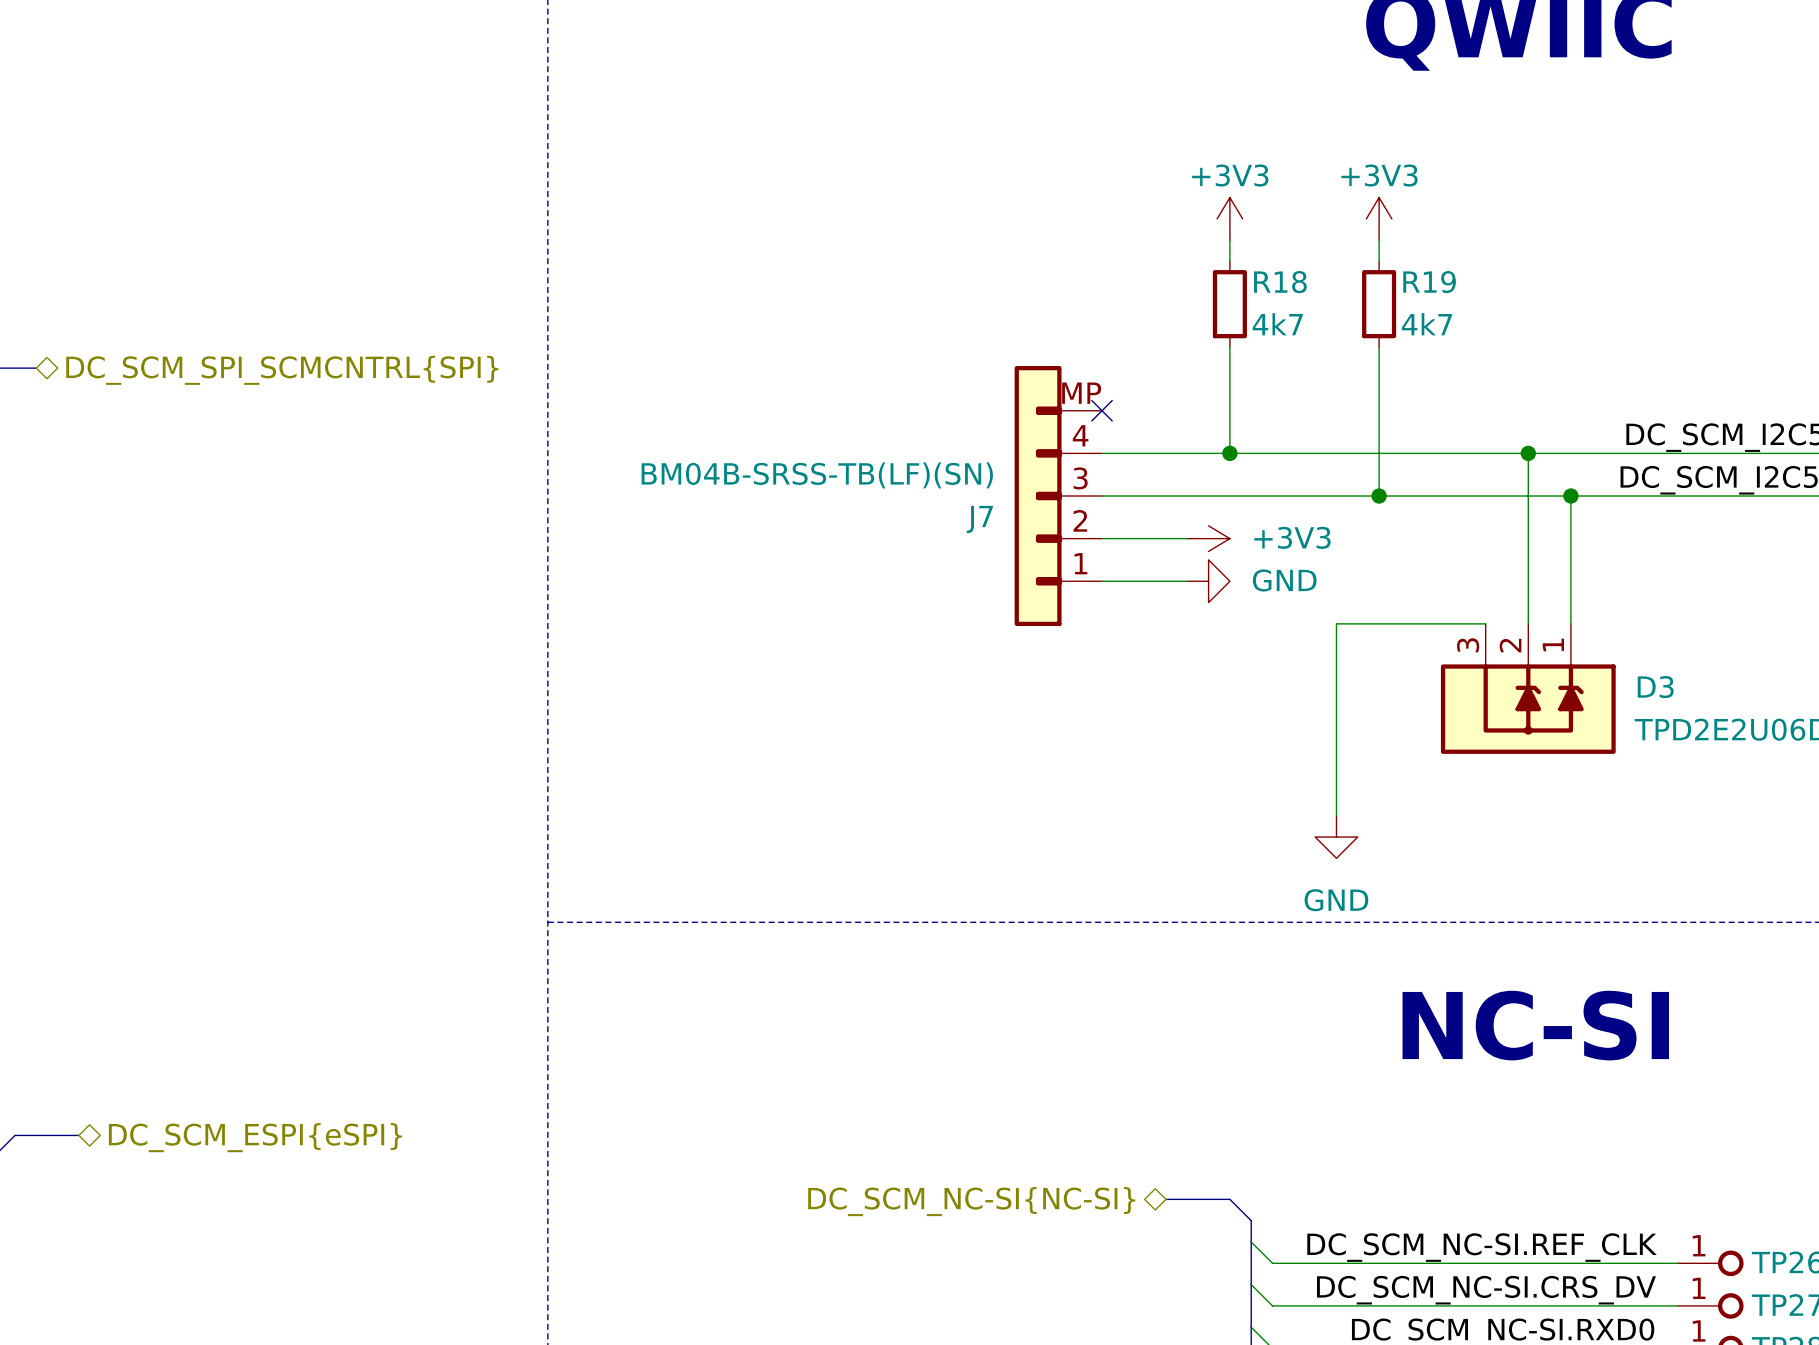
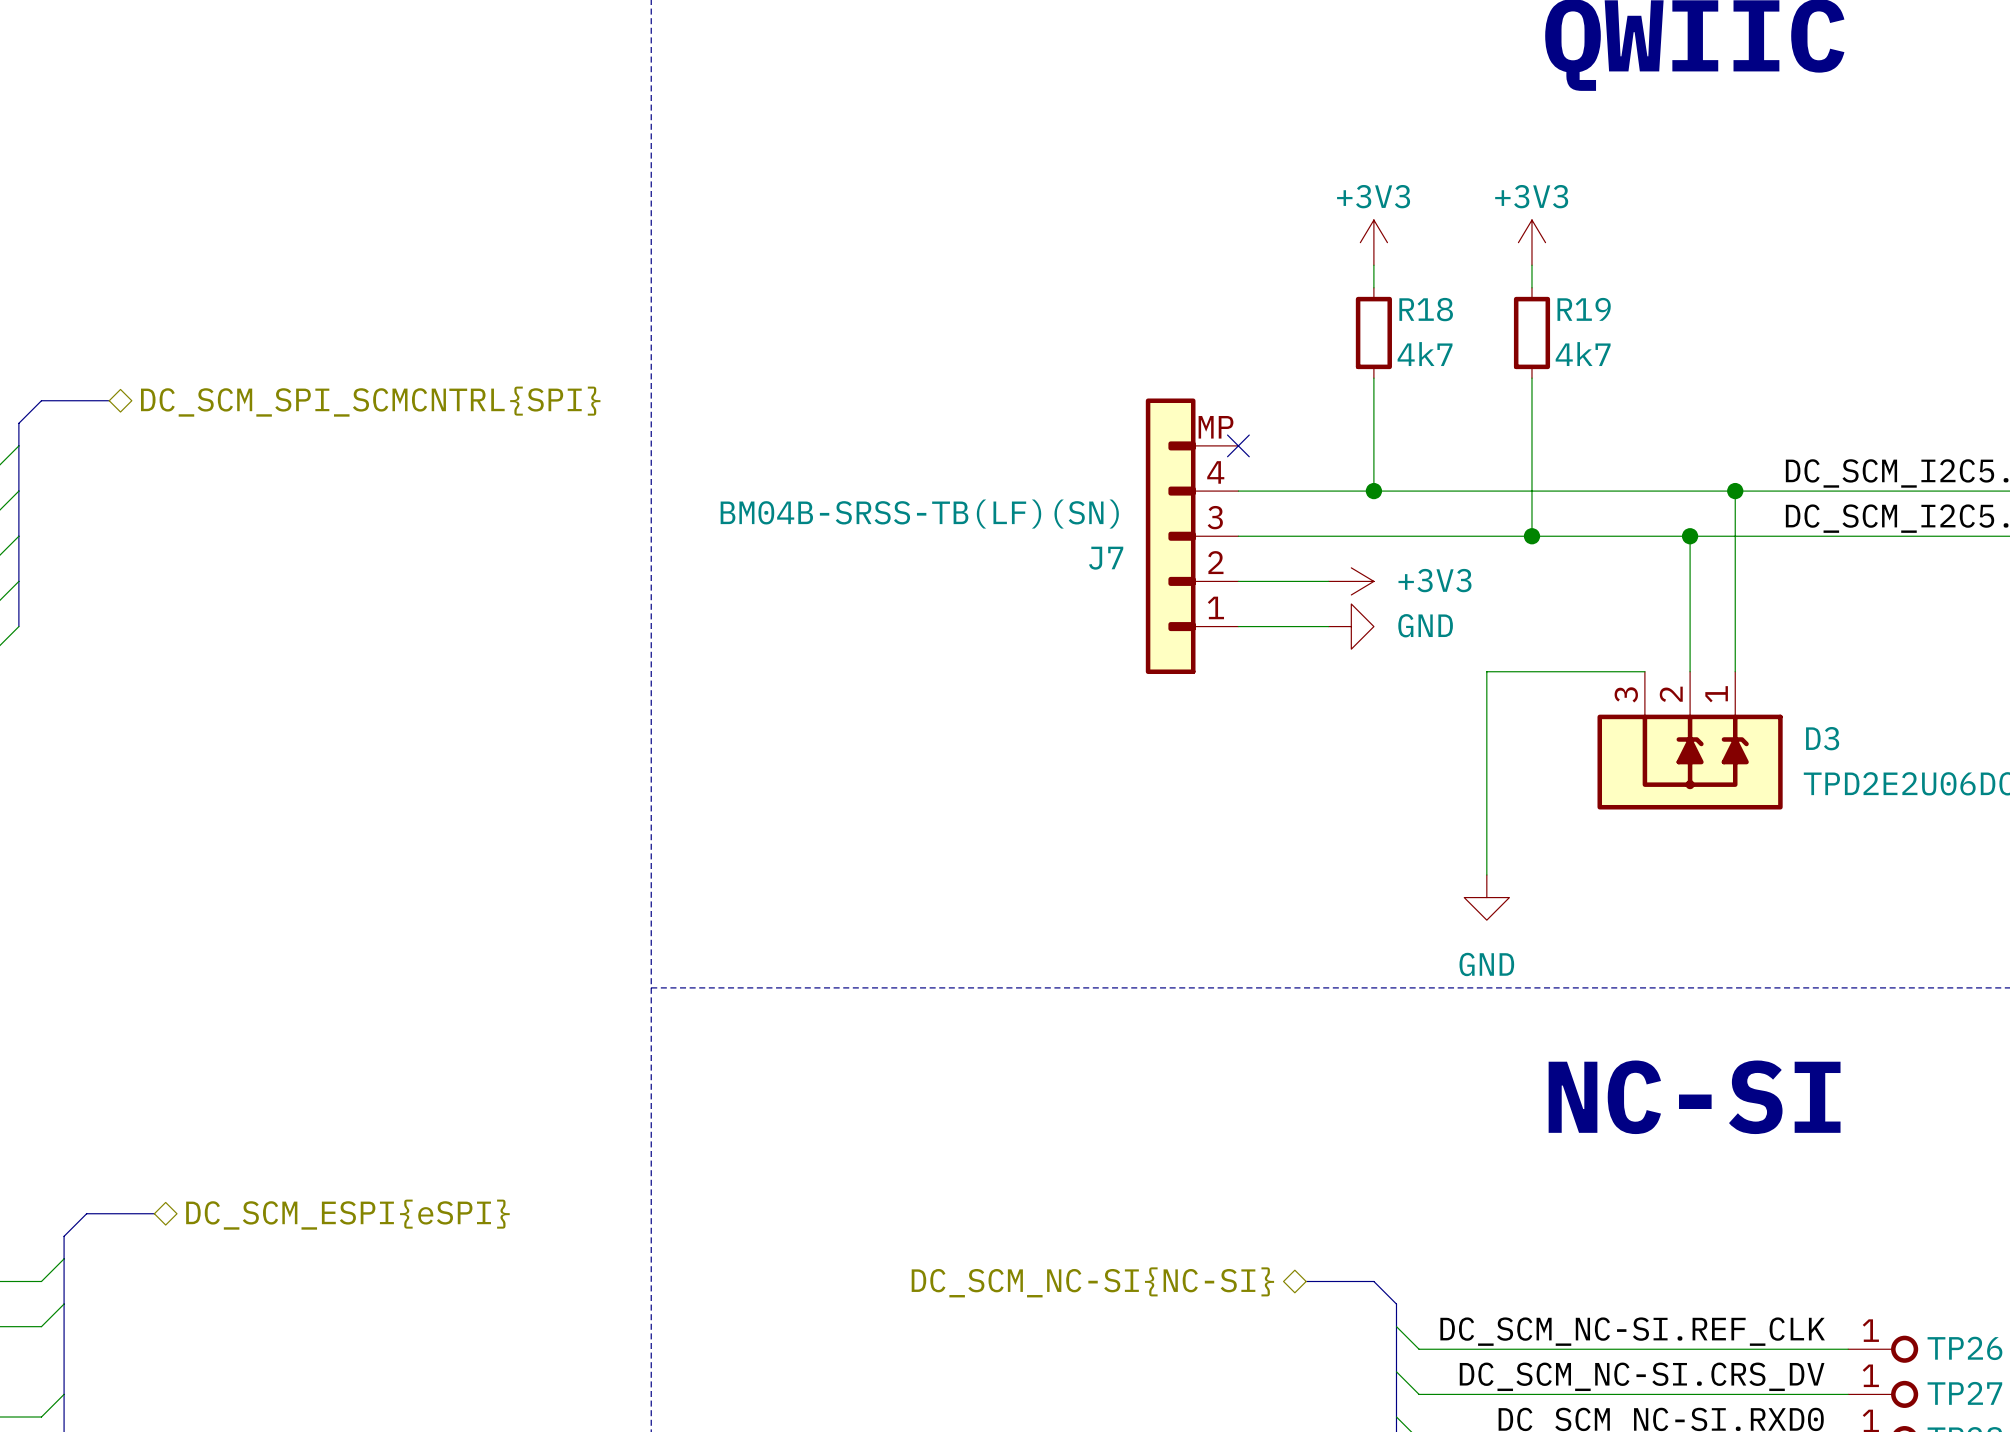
wire: (1528, 453) (1528, 496) -> (1735, 491) (1735, 536)
junction: (1528, 453) -> none
junction: none -> (1735, 491)
junction: none -> (1690, 536)
junction: (1570, 496) -> none

